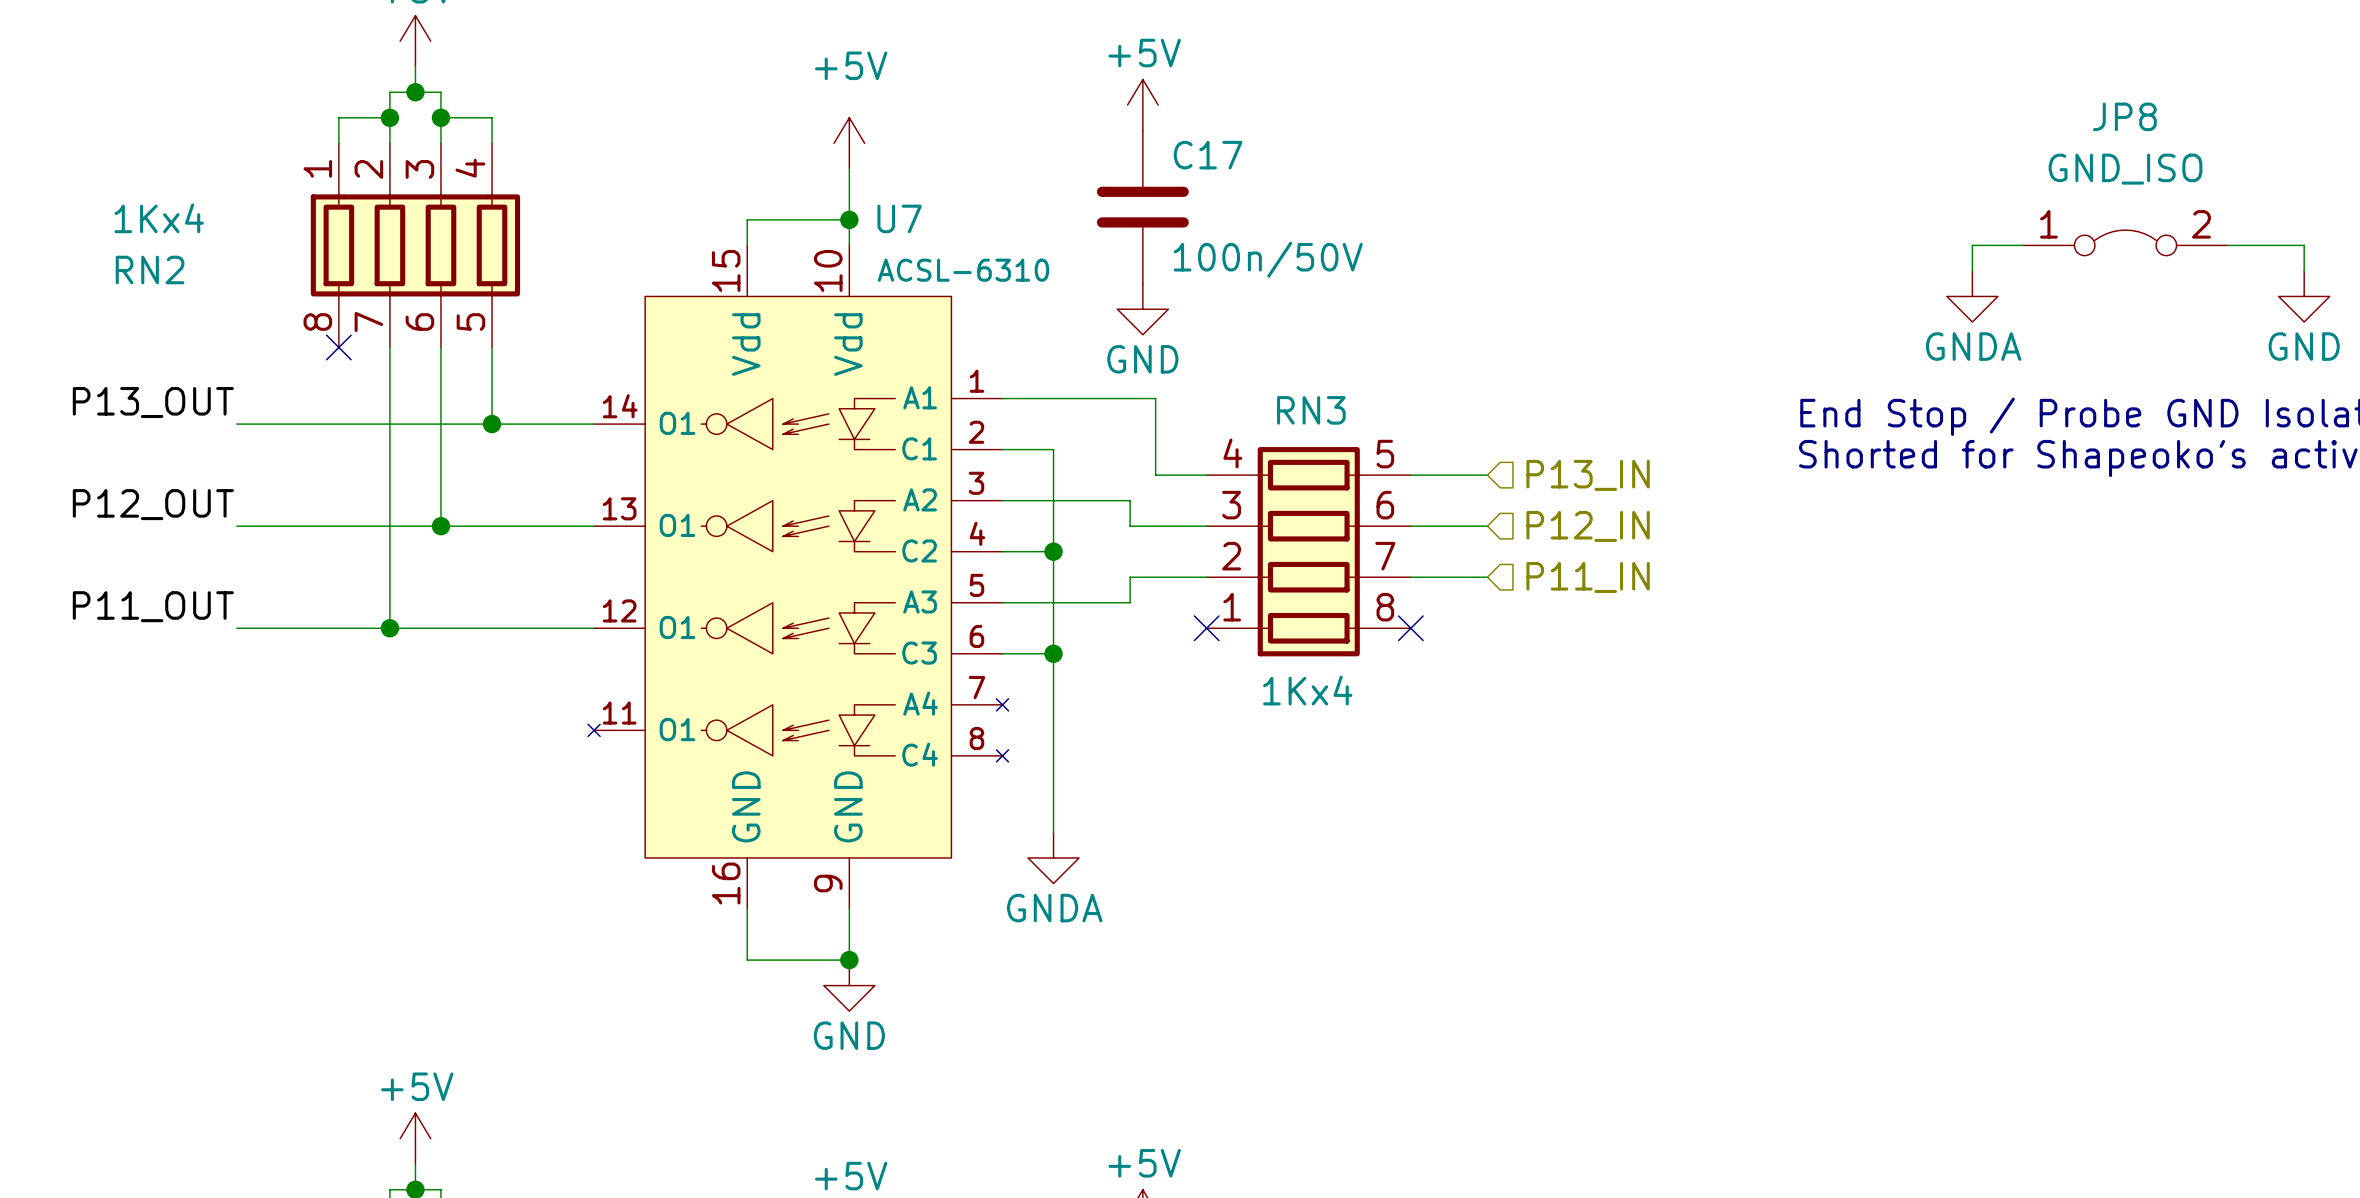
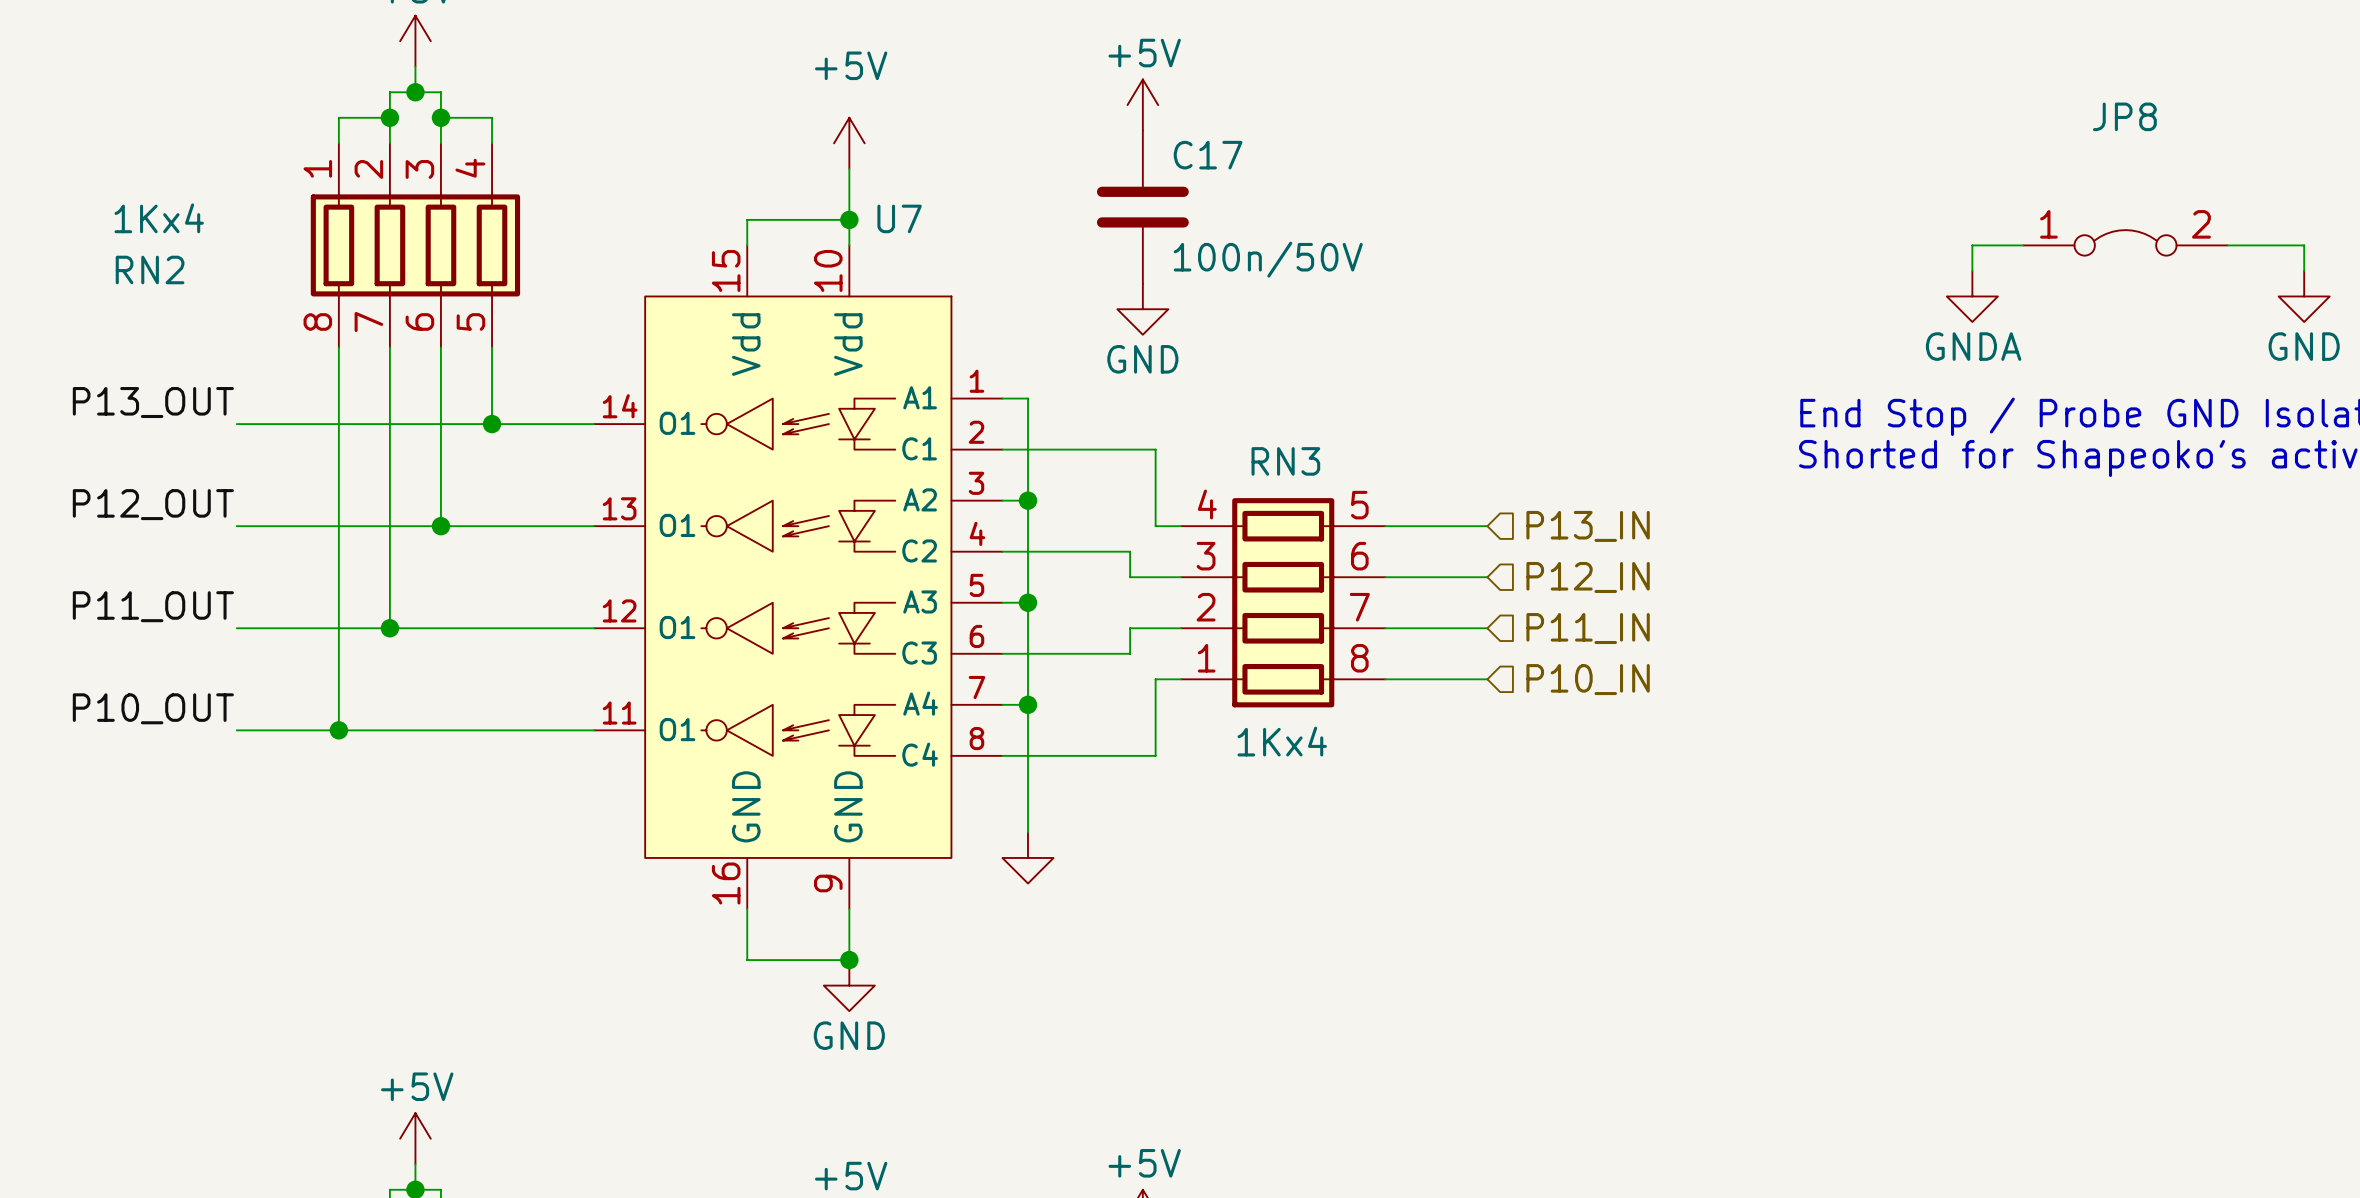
JP8 value: GND_ISO (2125, 169) -> none
U7 symbol: [588, 245, 1009, 910] -> [594, 245, 1003, 910]
U7 value: ACSL-6310 (963, 270) -> none
wire: none -> (338, 347) (338, 730)
no-connect mark: (338, 347) -> none
wire: (1028, 398) (1155, 398) (1155, 449) -> (1053, 449) (1155, 449)
wire: none -> (1028, 398) (1028, 832)
wire: (1053, 449) (1053, 832) -> none
wire: (1155, 475) (1206, 475) -> (1155, 475) (1155, 526)
wire: (1410, 475) (1487, 475) -> none
hierarchical label: P13_IN (1588, 475) -> none
wire: (1028, 500) (1130, 500) (1130, 526) (1155, 526) -> none
junction: none -> (1028, 500)
hierarchical label: P12_IN (1588, 526) -> P13_IN (1588, 526)
junction: (1053, 551) -> none
RN3 position: (1308, 551) -> (1283, 602)
wire: (1130, 577) (1130, 602) (1028, 602) -> (1130, 577) (1130, 551) (1053, 551)
hierarchical label: P11_IN (1588, 577) -> P12_IN (1588, 577)
junction: none -> (1028, 602)
wire: none -> (1181, 628) (1130, 628) (1130, 653) (1053, 653)
no-connect mark: (1206, 628) -> none
wire: none -> (1385, 628) (1487, 628)
no-connect mark: (1410, 628) -> none
hierarchical label: none -> P11_IN (1588, 628)
junction: (1053, 653) -> none
wire: none -> (1181, 679) (1155, 679) (1155, 755) (1002, 755)
wire: none -> (1385, 679) (1487, 679)
hierarchical label: none -> P10_IN (1588, 679)
wire: none -> (1002, 704) (1028, 704)
junction: none -> (1028, 704)
label: none -> P10_OUT (153, 708)
wire: none -> (236, 730) (594, 730)
junction: none -> (338, 730)
power symbol: none -> (1028, 857)
power symbol: GNDA (1053, 857) -> none

